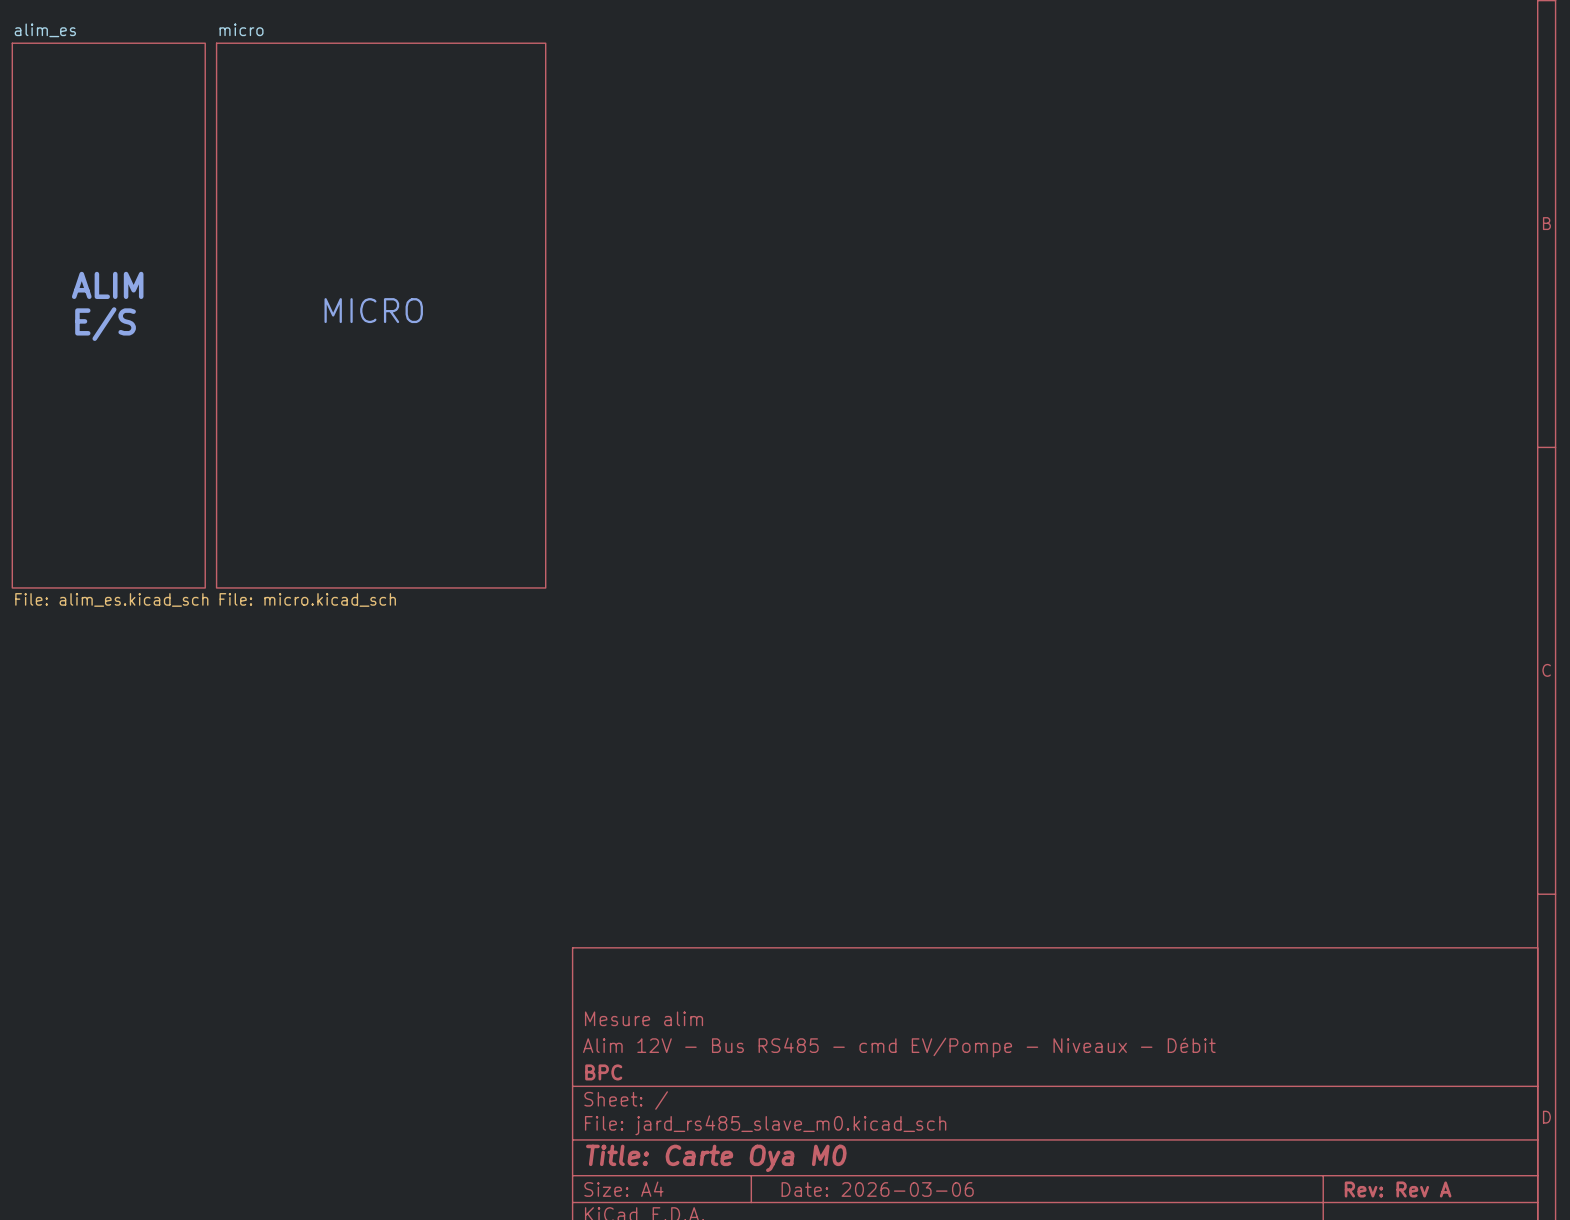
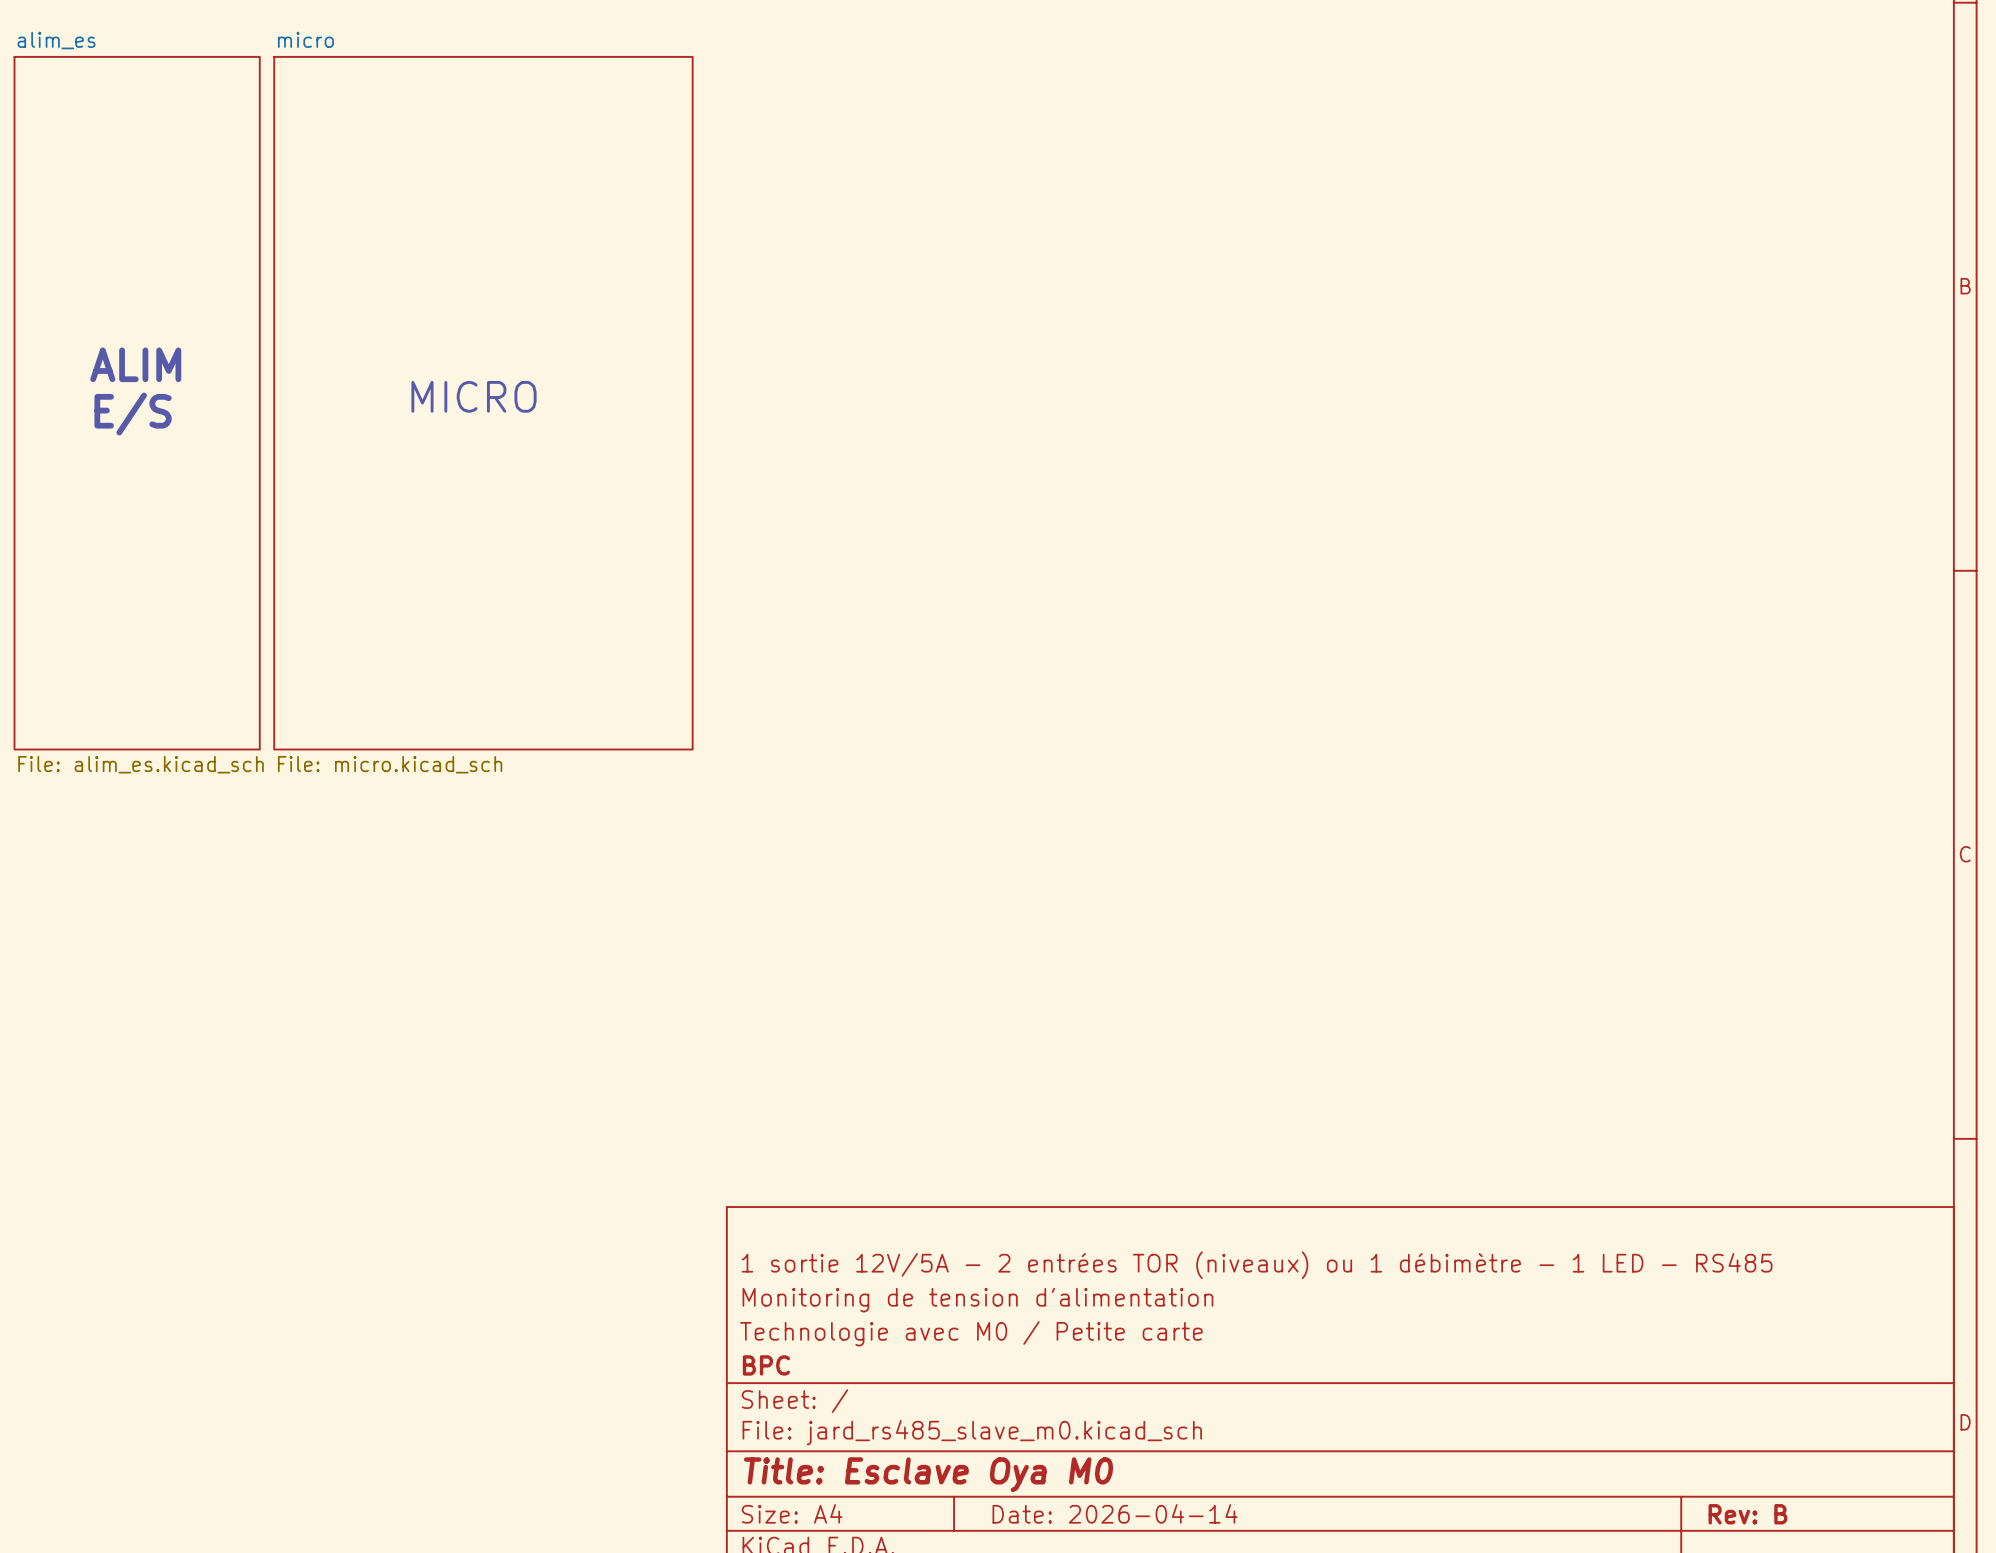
title block: none -> 1 sortie 12V/5A - 2 entrées TOR (niveaux) ou 1 débimètre - 1 LED - RS485 (1257, 1265)
title block: Mesure alim (644, 1018) -> Monitoring de tension d'alimentation (977, 1300)
title block: Alim 12V - Bus RS485 - cmd EV/Pompe - Niveaux - Débit (899, 1047) -> Technologie avec M0 / Petite carte (971, 1333)
title block: Title: Carte Oya M0 (716, 1158) -> Title: Esclave Oya M0 (928, 1474)
title block: Date: 2026-03-06 (877, 1189) -> Date: 2026-04-14 (1115, 1513)
title block: Rev: Rev A (1398, 1189) -> Rev: B (1747, 1514)

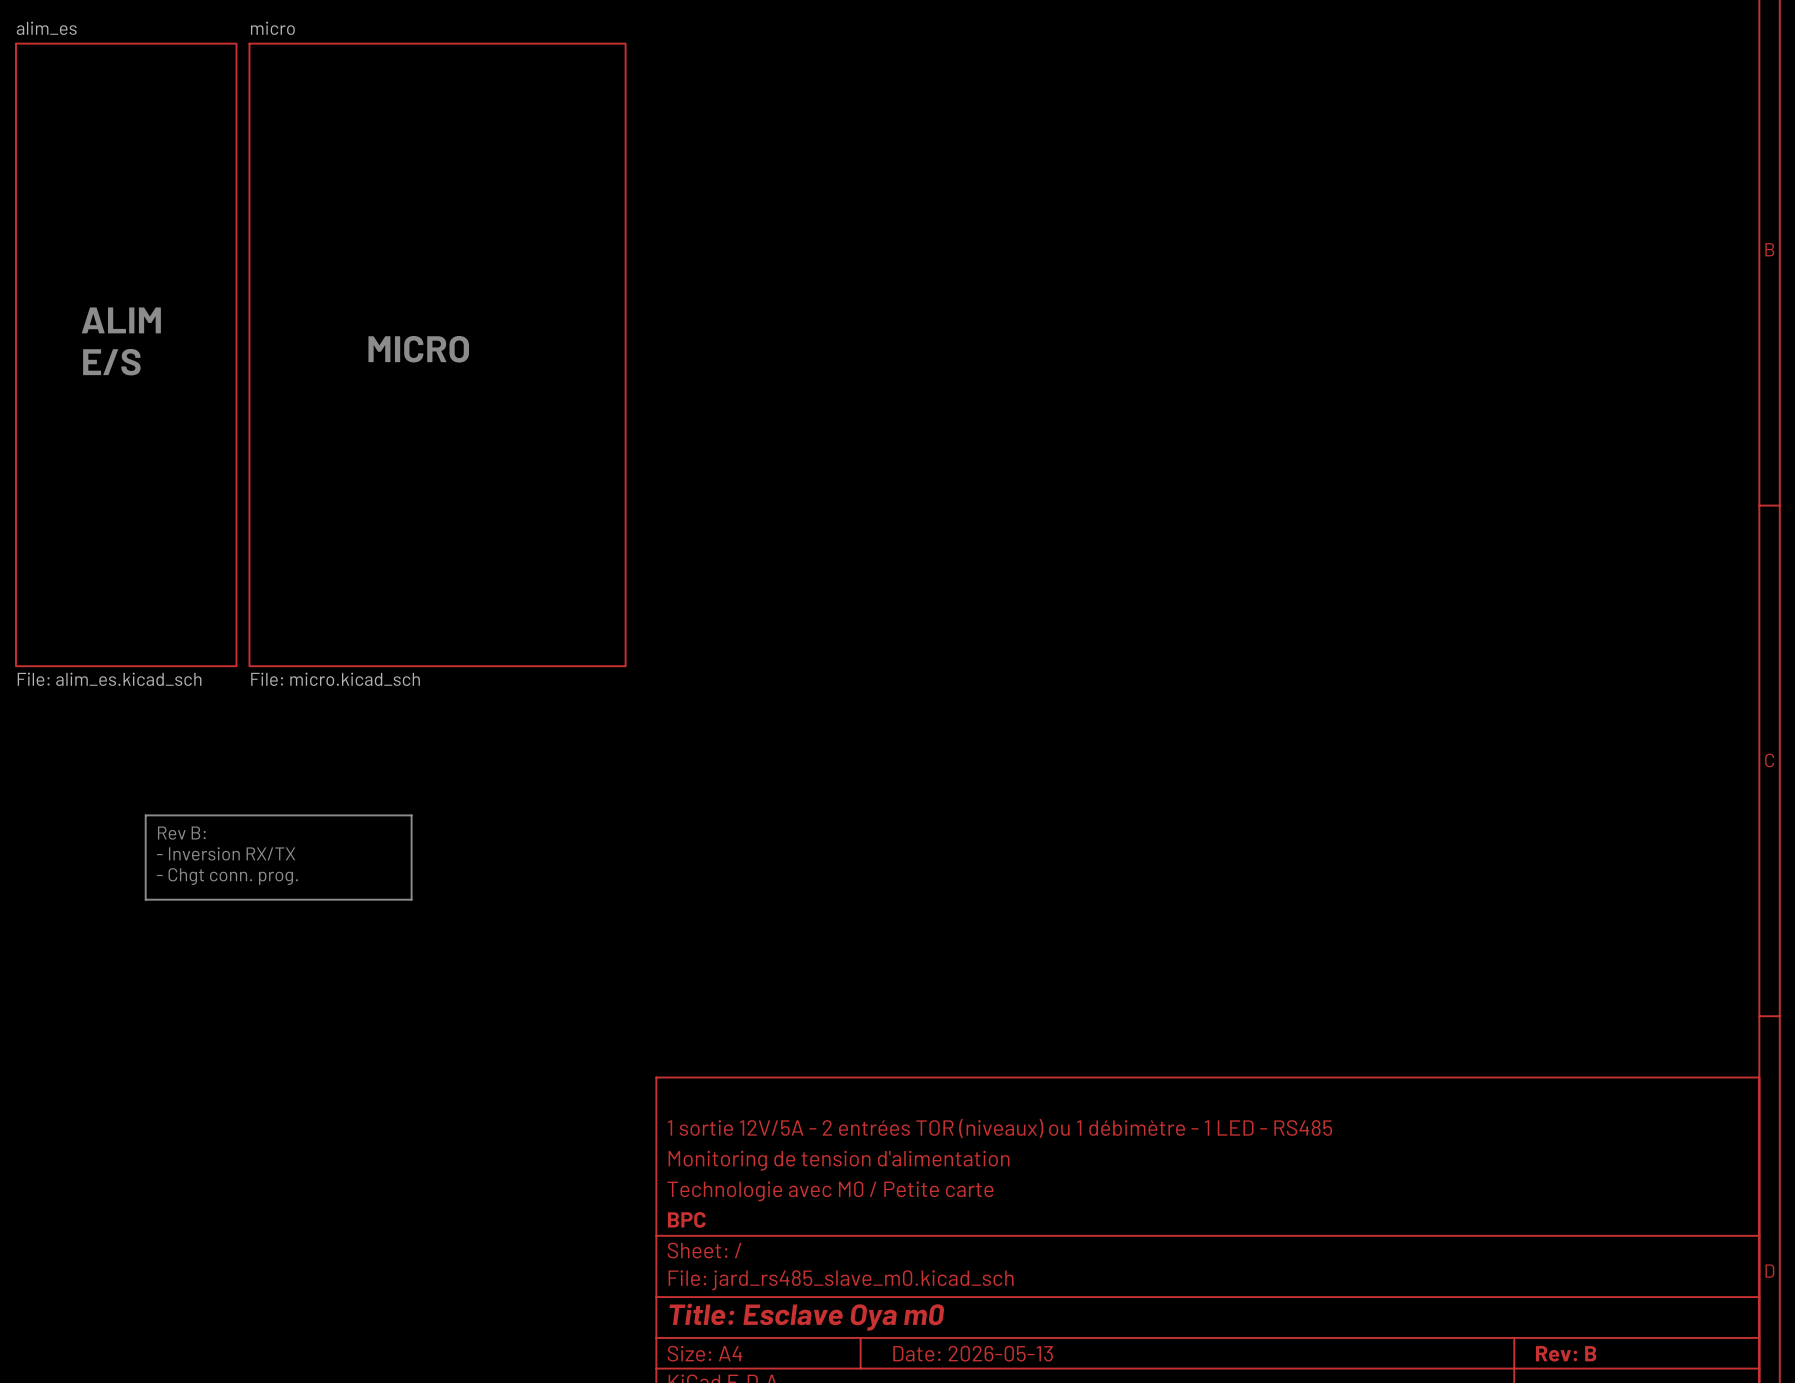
line: none -> (145, 815) (411, 815) (411, 899) (145, 899) (145, 815)
text: none -> Rev B: (181, 833)
text: none -> - Inversion RX/TX (226, 853)
text: none -> - Chgt conn. prog. (227, 876)
title block: Title: Esclave Oya M0 (928, 1474) -> Title: Esclave Oya m0 (806, 1317)
title block: Date: 2026-04-14 (1115, 1513) -> Date: 2026-05-13 (973, 1353)

